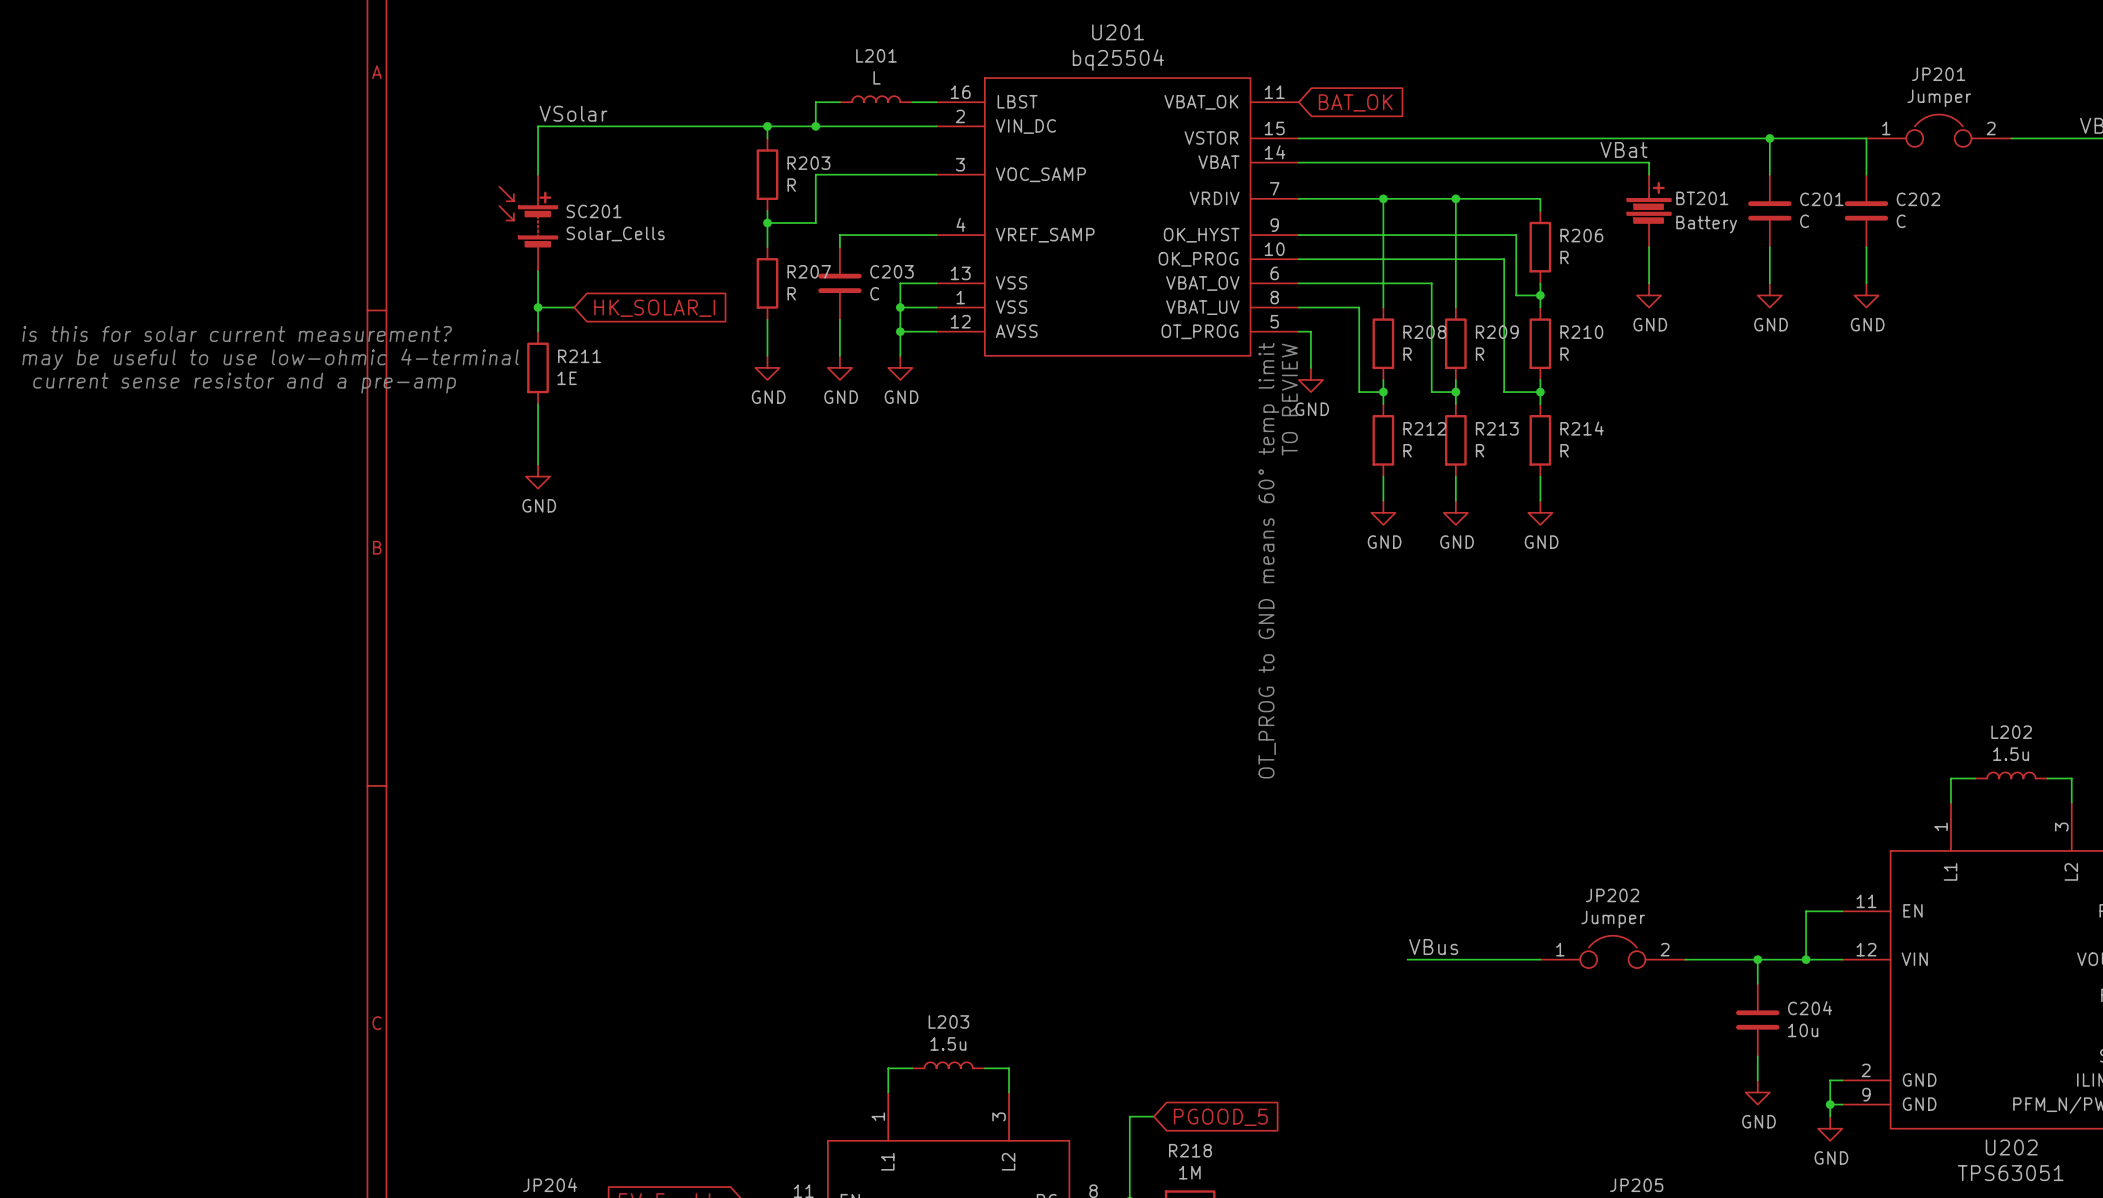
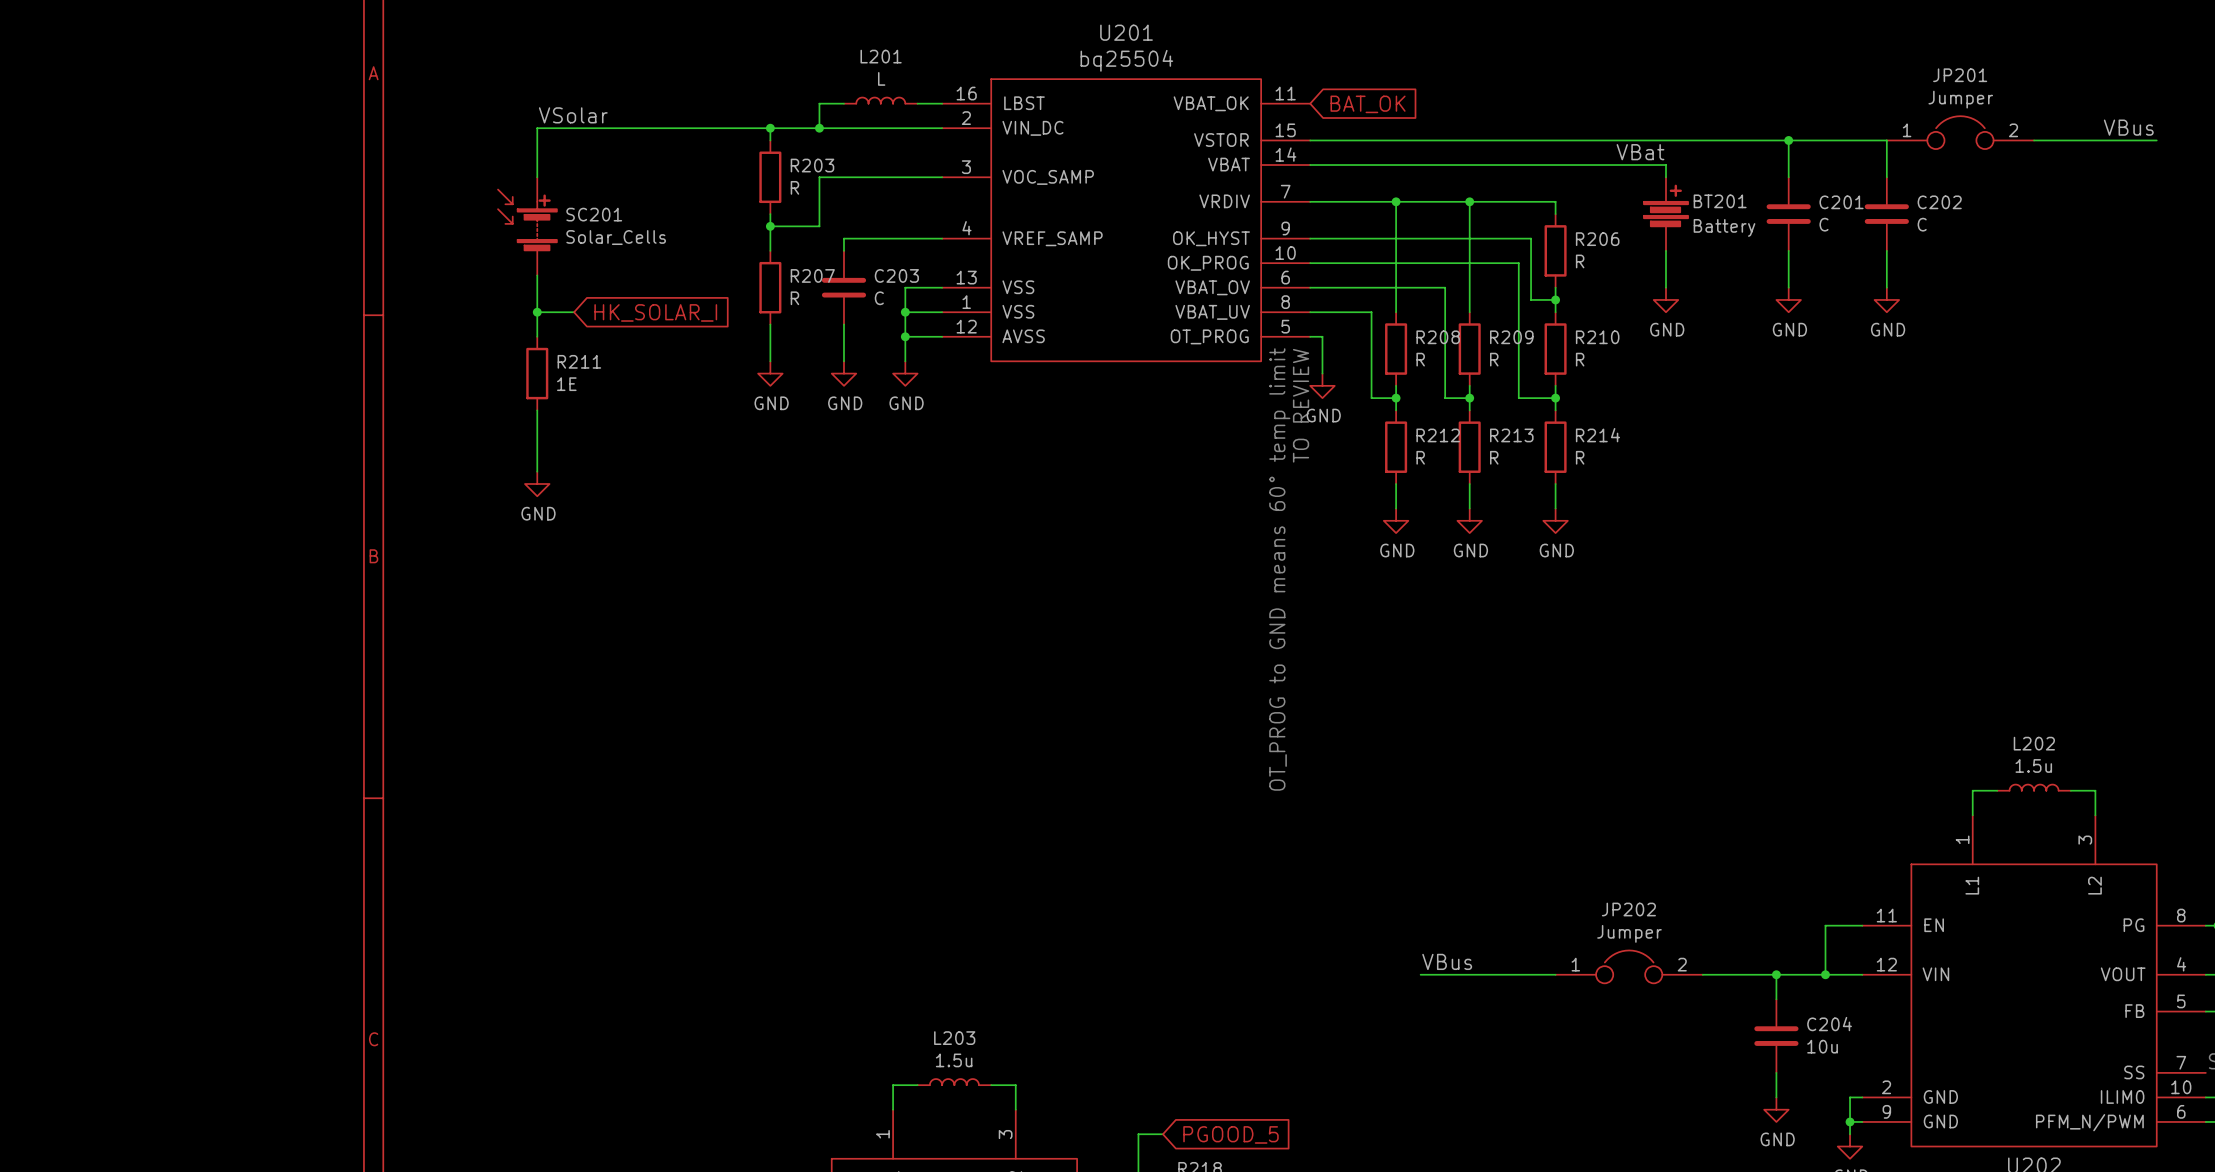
text: is this for solar current measurement? (237, 333) -> none
text: may be useful to use low-ohmic 4-terminal (270, 359) -> none
text: current sense resistor and a pre-amp (244, 383) -> none

